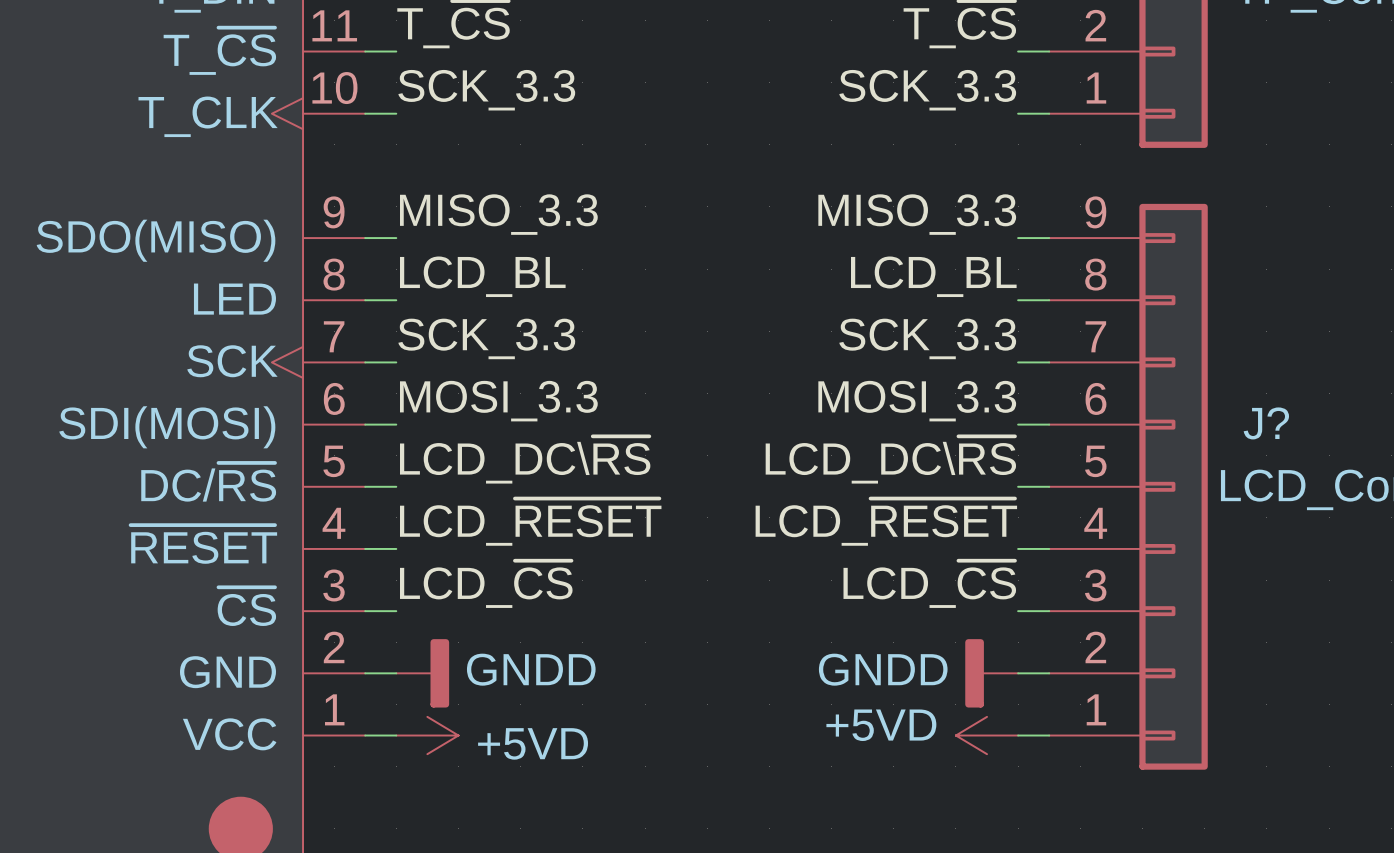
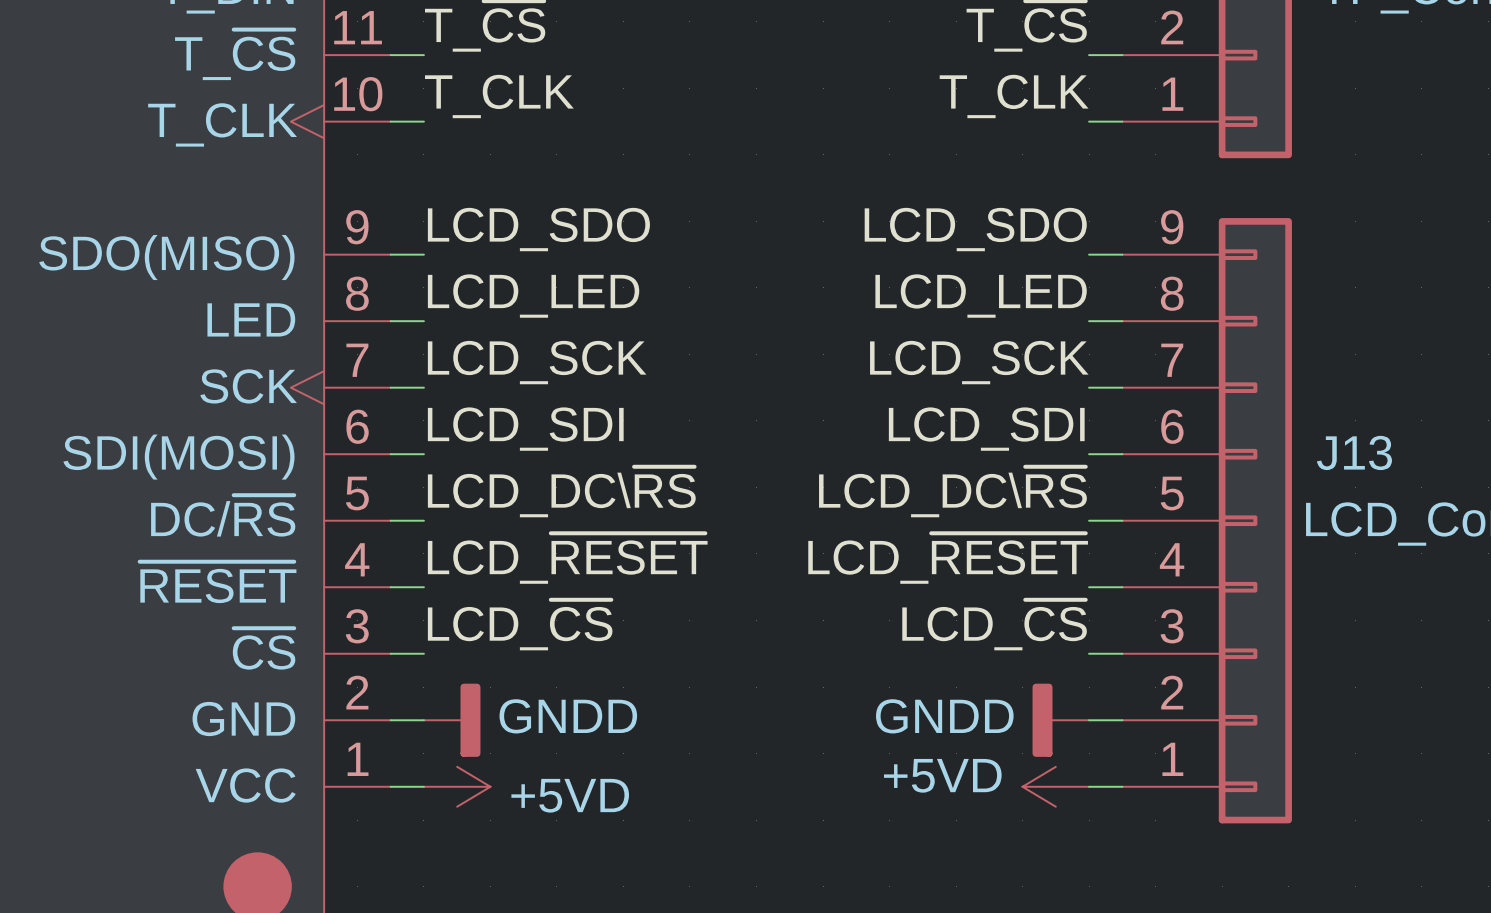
label: SCK_3.3 (486, 90) -> T_CLK (499, 96)
label: SCK_3.3 (927, 90) -> T_CLK (1014, 96)
label: MISO_3.3 (498, 214) -> LCD_SDO (538, 229)
label: MISO_3.3 (917, 214) -> LCD_SDO (975, 229)
label: LCD_BL (482, 276) -> LCD_LED (533, 296)
label: LCD_BL (933, 276) -> LCD_LED (981, 296)
label: SCK_3.3 (486, 338) -> LCD_SCK (537, 362)
label: SCK_3.3 (927, 338) -> LCD_SCK (979, 362)
label: MOSI_3.3 (498, 401) -> LCD_SDI (525, 429)
label: MOSI_3.3 (917, 401) -> LCD_SDI (986, 429)
J? name: J? (1266, 423) -> J13 (1354, 452)

